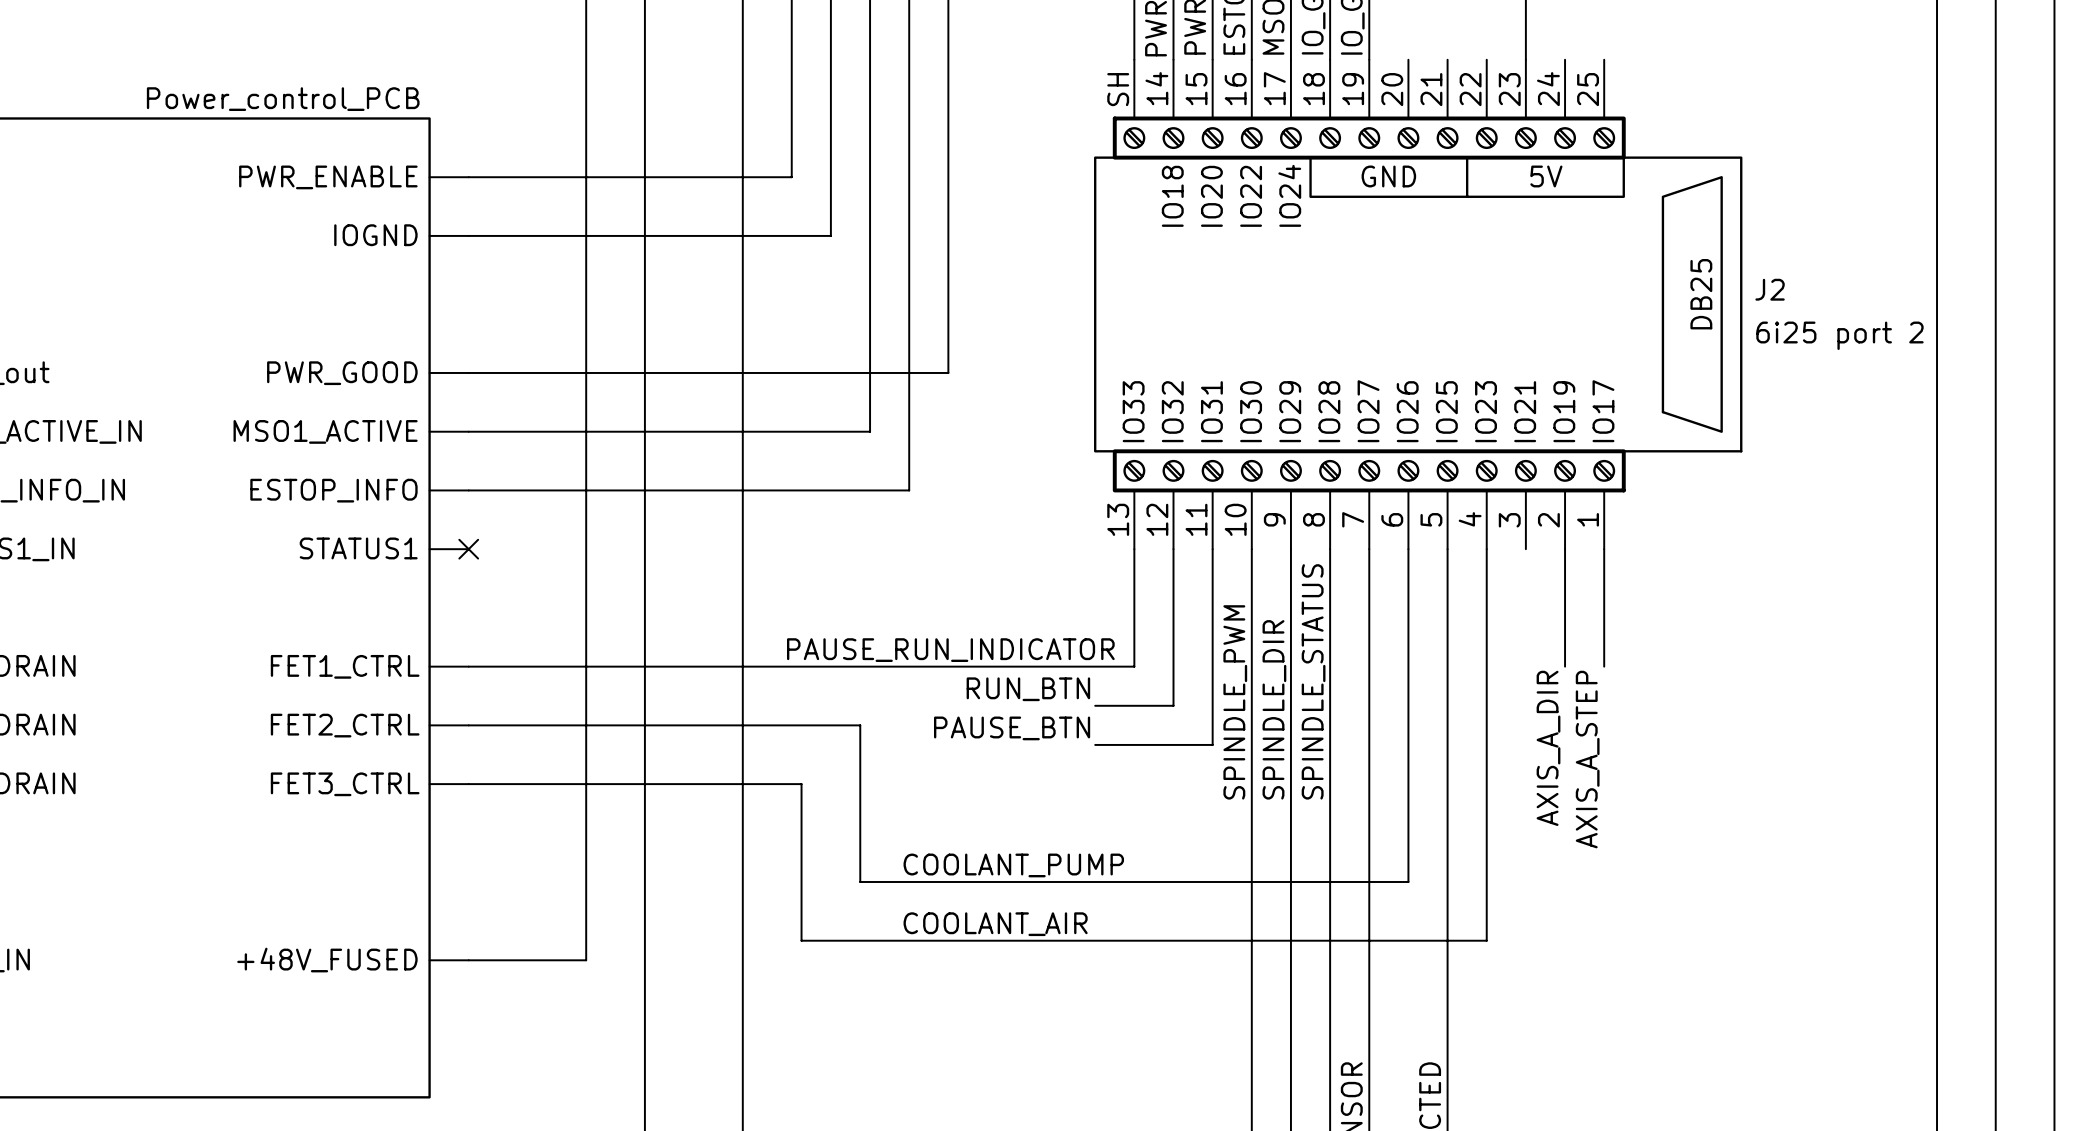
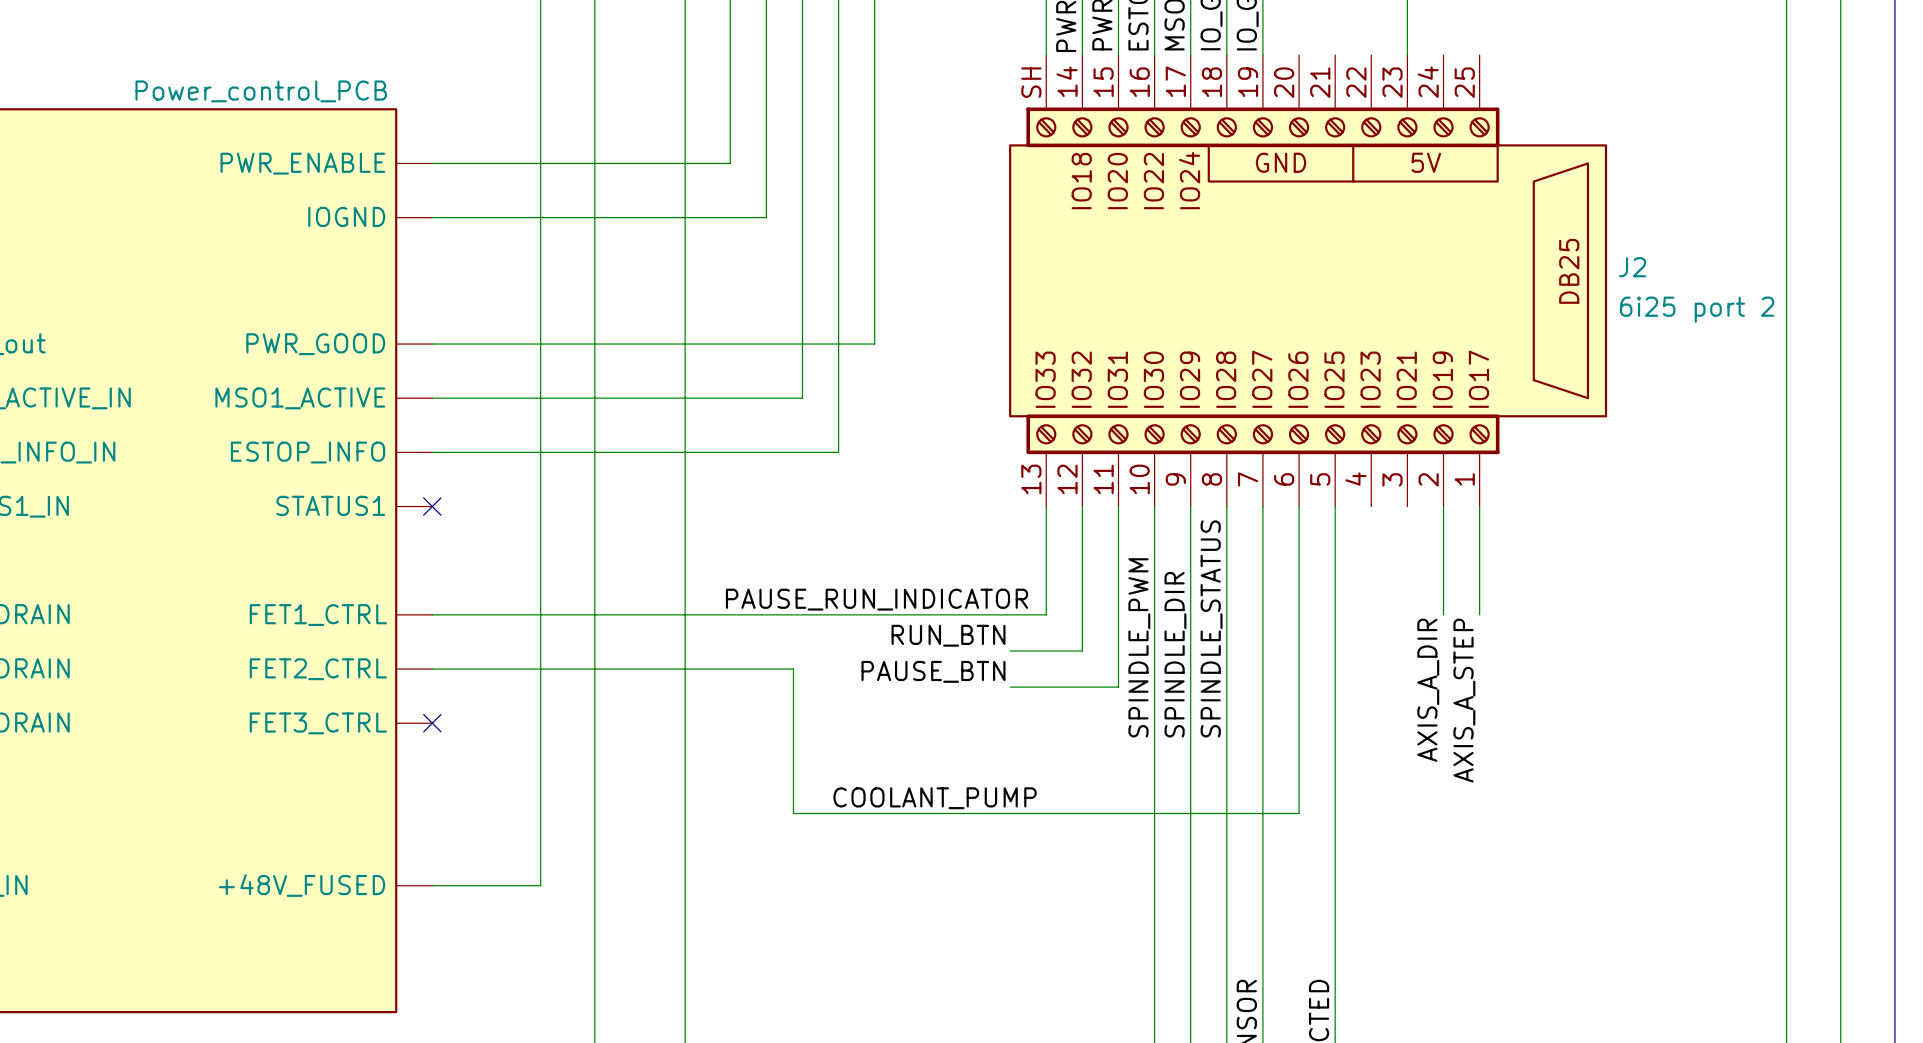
wire: (1486, 549) (1486, 940) (801, 940) (801, 784) (468, 784) -> none
no-connect mark: none -> (432, 723)
label: COOLANT_AIR (995, 924) -> none

